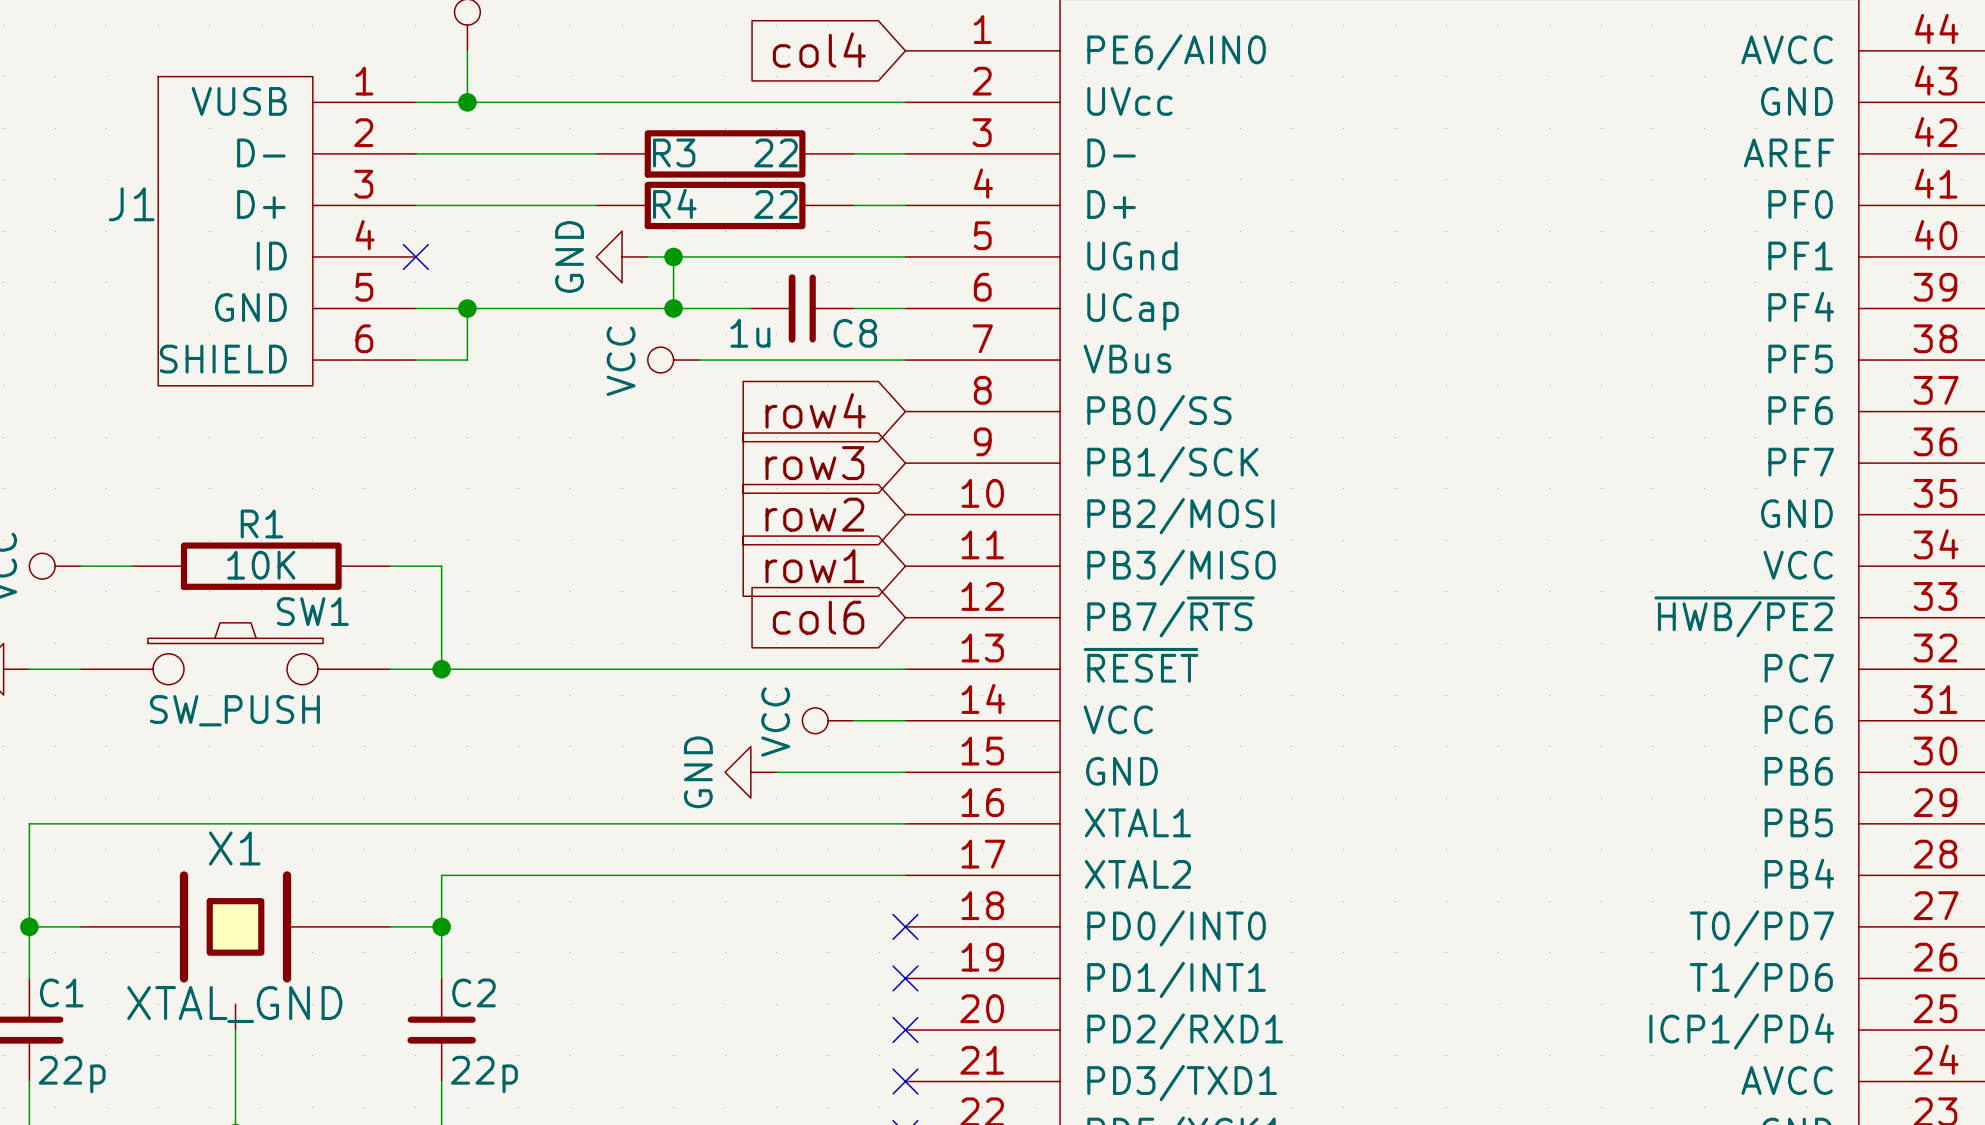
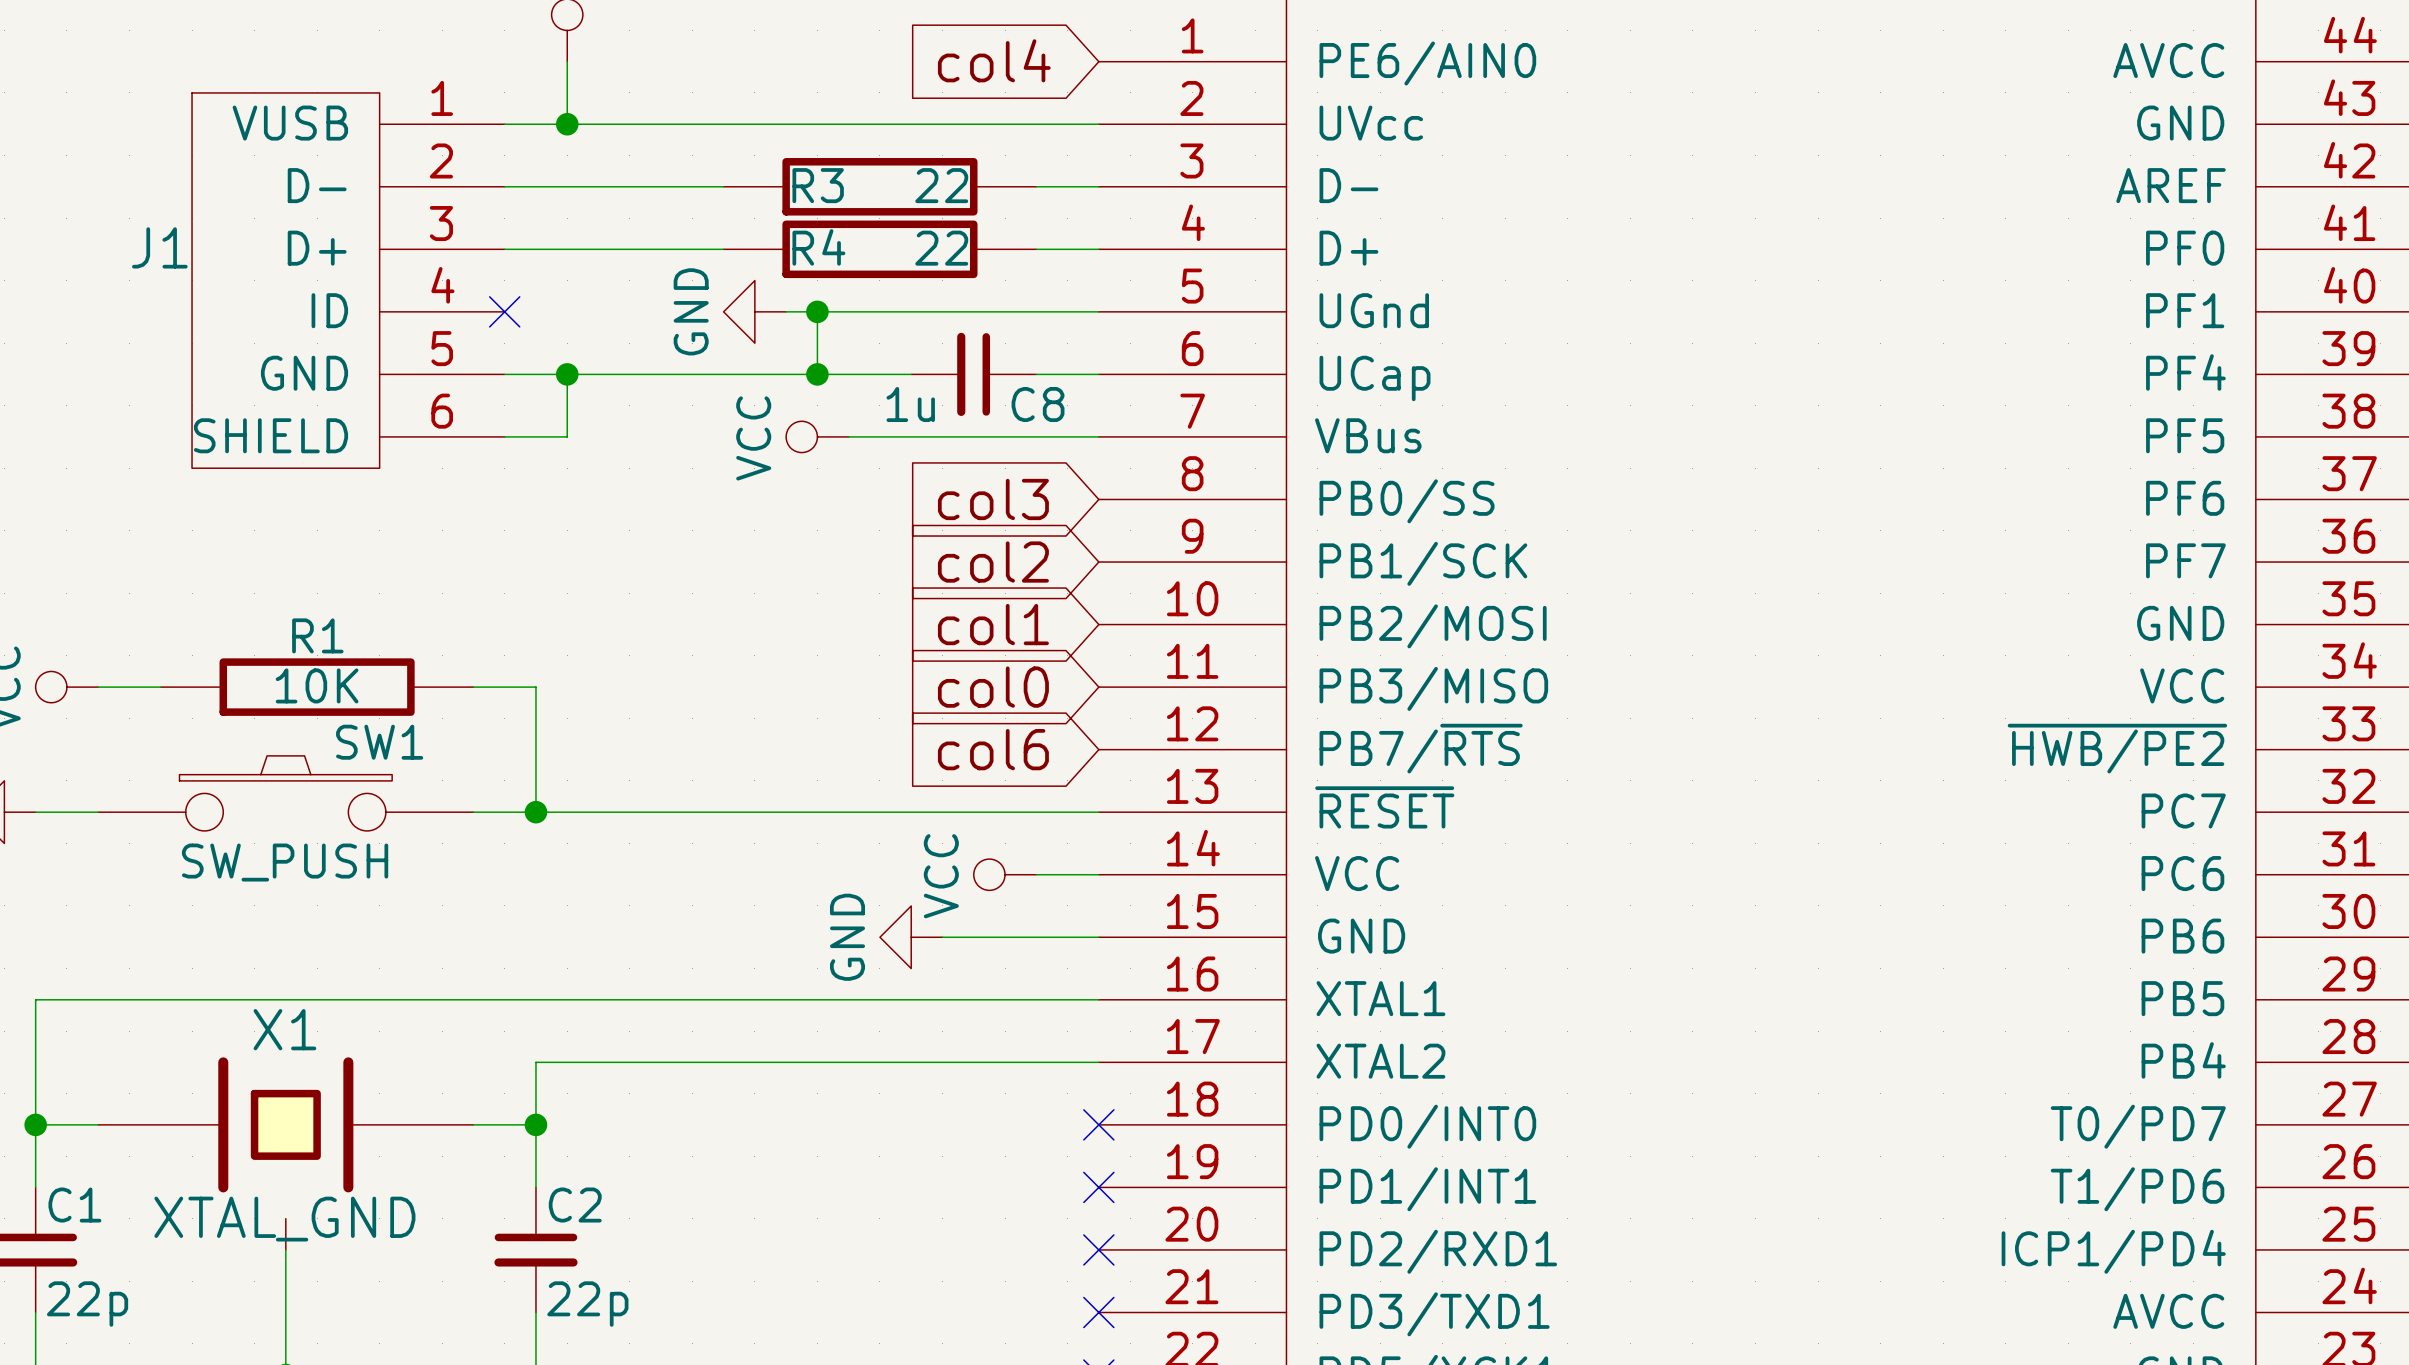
global label: row4 (815, 410) -> col3 (993, 499)
global label: row3 (814, 463) -> col2 (993, 562)
global label: row2 (814, 514) -> col1 (993, 624)
global label: row1 (814, 566) -> col0 (993, 687)

